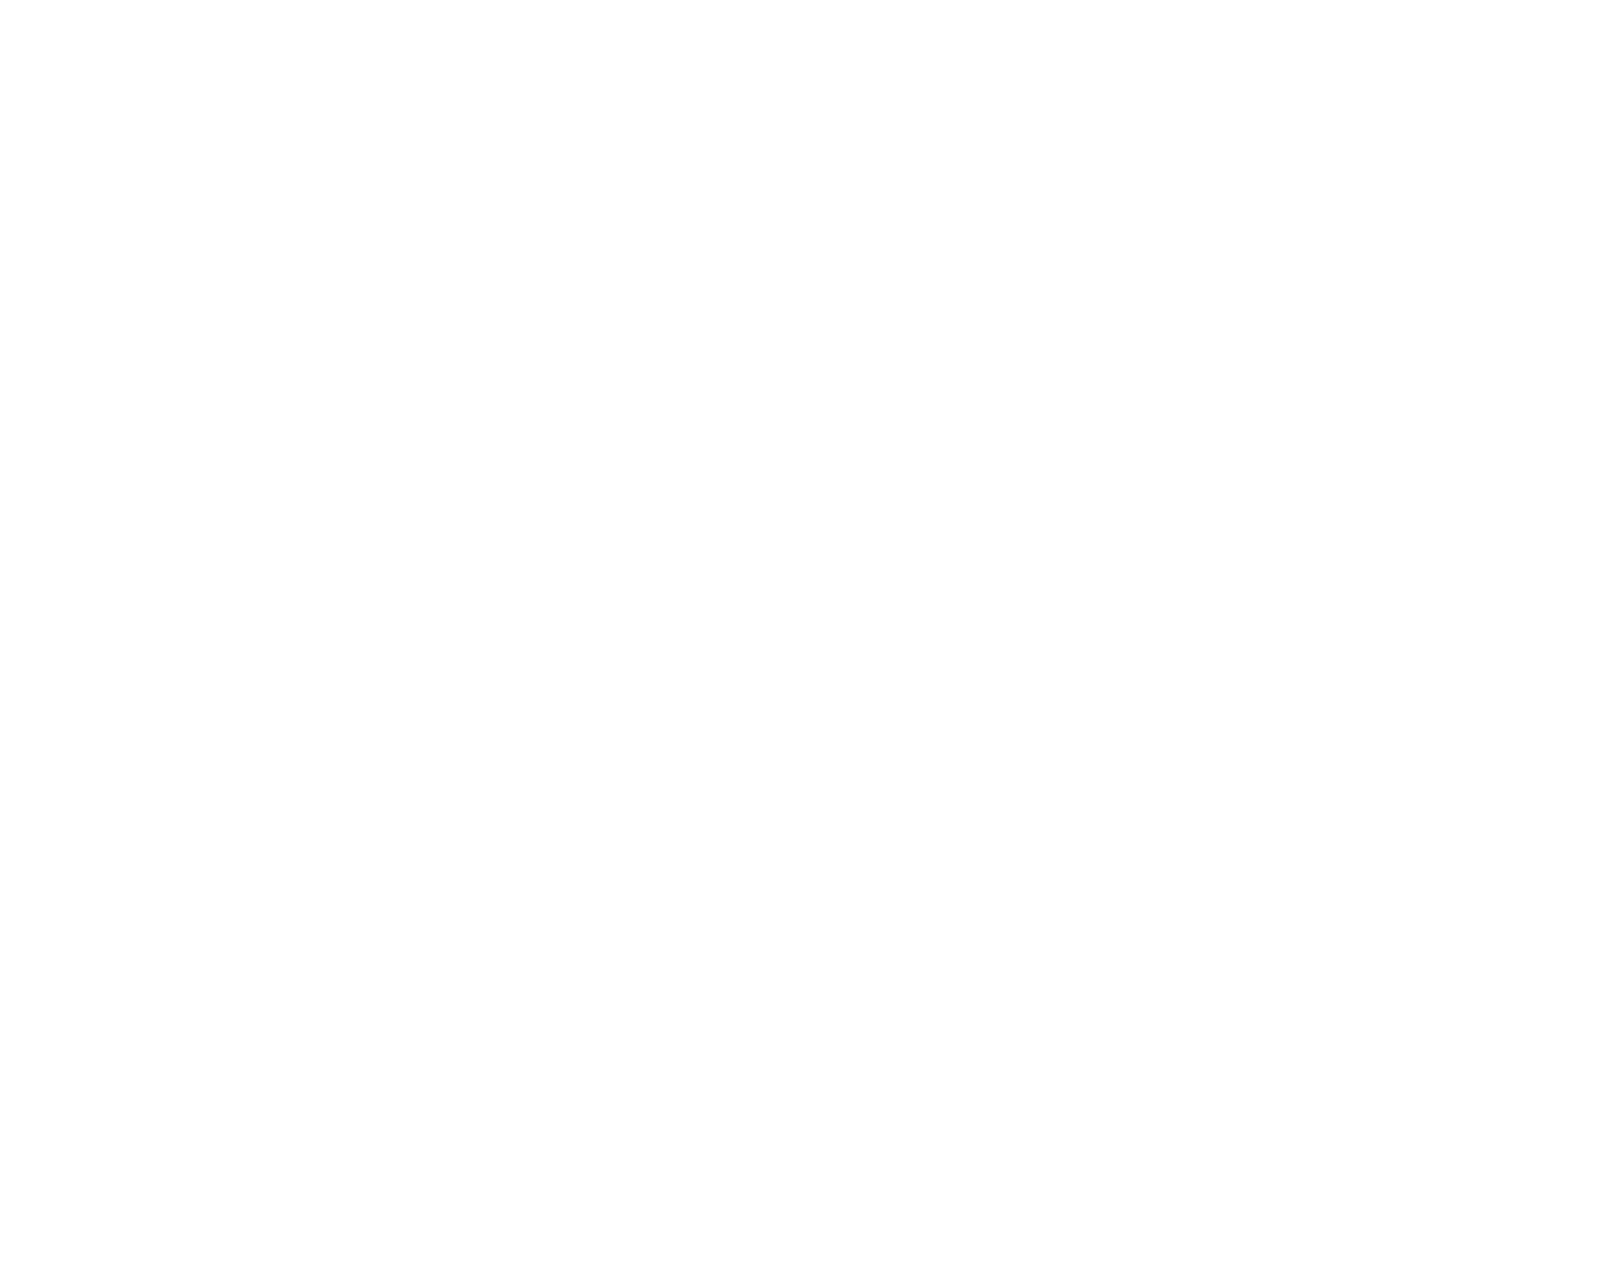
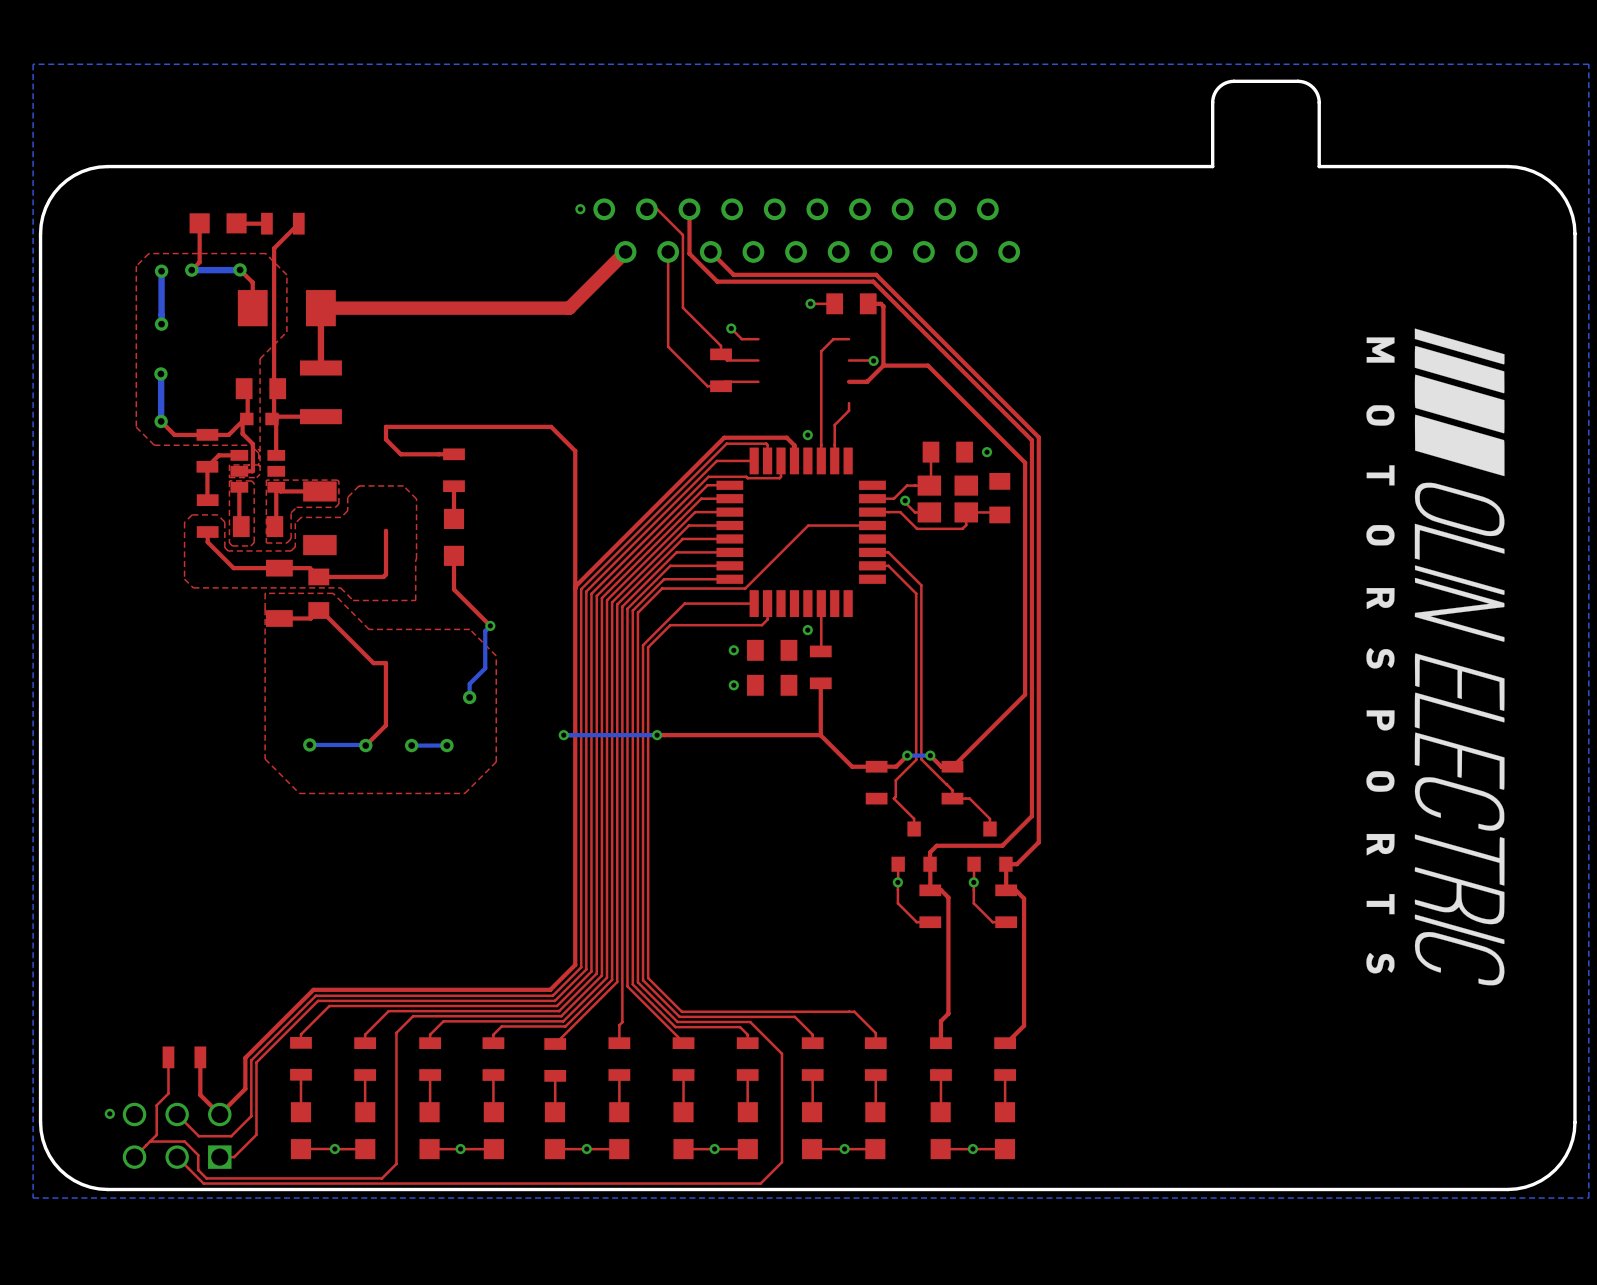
bottom zone outline: none -> (1588, 64) (1588, 1198) (33, 1198) (33, 64) (1588, 64)
board edge: none -> (1297, 81) (1231, 81) (1218, 87) (1212, 99) (1212, 166) (107, 166) (81, 171) (66, 180) (49, 200) (42, 216) (40, 233) (40, 1122) (45, 1148) (54, 1163) (66, 1175) (81, 1184) (107, 1189) (1507, 1189) (1525, 1187) (1548, 1175) (1561, 1163) (1569, 1148) (1574, 1122) (1574, 233) (1572, 216) (1565, 200) (1555, 186) (1541, 175) (1516, 167) (1319, 166) (1318, 97) (1310, 85) (1297, 81)
via: none -> (580, 209)
top track: none -> (647, 209) (657, 209) (682, 235) (682, 307) (721, 345) (721, 354) (727, 360) (758, 360)
top track: none -> (689, 209) (689, 253) (717, 281) (873, 281) (1031, 440) (1031, 816) (1002, 845) (936, 845) (930, 852) (930, 890) (941, 890) (948, 897) (948, 1013) (940, 1021) (940, 1043)
top track: none -> (199, 223) (199, 262) (190, 271)
part: none -> (218, 223)
top track: none -> (265, 223) (236, 223)
part: none -> (282, 223)
top track: none -> (298, 223) (274, 248) (274, 416) (276, 418)
part: none -> (806, 230)
top track: none -> (625, 251) (569, 308) (320, 308)
top track: none -> (668, 251) (668, 346) (707, 386) (721, 386) (725, 381) (758, 381)
top track: none -> (710, 251) (733, 274) (876, 274) (1038, 437) (1038, 842) (1016, 864) (1005, 864)
top zone outline: none -> (265, 253) (286, 274) (286, 331) (260, 358) (260, 474) (256, 477) (229, 477) (229, 464) (258, 464) (258, 453) (250, 445) (154, 445) (136, 427) (136, 266) (148, 253) (265, 253)
top track: none -> (240, 269) (252, 282) (252, 308) (252, 304)
via: none -> (240, 269)
via: none -> (191, 270)
bottom track: none -> (239, 270) (191, 270)
bottom track: none -> (161, 271) (161, 324)
via: none -> (161, 271)
via: none -> (810, 303)
top track: none -> (834, 303) (810, 303)
part: none -> (851, 303)
top track: none -> (868, 303) (880, 303) (883, 306) (883, 365)
part: none -> (286, 308)
top track: none -> (320, 308) (320, 368)
via: none -> (161, 324)
top track: none -> (731, 328) (741, 339) (758, 339)
via: none -> (731, 328)
drawing: none -> [1366, 328, 1505, 986]
top track: none -> (849, 339) (833, 339) (821, 351) (821, 460)
top track: none -> (849, 360) (873, 360)
via: none -> (873, 360)
top track: none -> (883, 365) (867, 381) (849, 381)
top track: none -> (883, 365) (927, 365) (1025, 462) (1025, 694) (953, 766)
part: none -> (721, 370)
via: none -> (160, 373)
bottom track: none -> (161, 374) (161, 421)
top track: none -> (247, 388) (247, 413) (242, 418) (242, 433) (252, 444) (252, 470) (239, 471)
part: none -> (260, 388)
part: none -> (320, 392)
top track: none -> (849, 403) (849, 410) (834, 425) (834, 460)
top track: none -> (320, 416) (278, 416) (276, 418)
part: none -> (259, 418)
top track: none -> (276, 418) (276, 455)
via: none -> (161, 421)
top track: none -> (242, 421) (228, 434) (174, 434) (161, 421)
via: none -> (807, 435)
top zone outline: none -> (257, 449) (260, 451)
part: none -> (207, 450)
top track: none -> (931, 452) (931, 483) (929, 485) (907, 485) (893, 498) (872, 498)
part: none -> (947, 452)
via: none -> (987, 452)
top track: none -> (454, 454) (400, 454) (386, 439) (386, 426) (551, 426) (575, 451) (575, 964) (550, 989) (313, 989) (245, 1057) (245, 1088) (219, 1114) (200, 1095) (200, 1057)
top track: none -> (239, 455) (218, 455) (207, 466) (207, 500)
top track: none -> (754, 460) (716, 460) (586, 591) (586, 969) (554, 1000) (318, 1000) (256, 1062) (256, 1134) (234, 1157) (219, 1157)
top track: none -> (767, 460) (766, 443) (726, 443) (581, 589) (581, 967) (552, 995) (315, 995) (251, 1060) (251, 1116) (231, 1136) (198, 1136) (177, 1114)
top track: none -> (781, 460) (779, 478) (708, 476) (591, 593) (591, 971) (557, 1006) (329, 1006) (300, 1034) (300, 1042)
top track: none -> (794, 460) (794, 445) (786, 437) (724, 437) (575, 586)
top zone outline: none -> (258, 464) (260, 466)
part: none -> (454, 470)
part: none -> (257, 471)
top zone outline: none -> (251, 480) (254, 483) (254, 542) (250, 545) (232, 545) (229, 543) (229, 480) (251, 480)
top zone outline: none -> (337, 480) (266, 480) (266, 543) (286, 543) (291, 538) (291, 512) (296, 507) (335, 507) (338, 503) (338, 481) (337, 480)
top zone outline: none -> (403, 485) (416, 498) (415, 600) (353, 600) (340, 587) (193, 587) (184, 579) (184, 522) (192, 514) (217, 514) (224, 522) (224, 547) (228, 550) (291, 550) (295, 546) (295, 523) (301, 517) (341, 517) (347, 510) (347, 497) (359, 485) (403, 485)
top track: none -> (729, 485) (707, 485) (596, 595) (596, 973) (559, 1011) (388, 1011) (365, 1034) (365, 1043)
top track: none -> (454, 486) (454, 518)
top track: none -> (239, 487) (239, 524) (241, 526)
top track: none -> (315, 487) (319, 491) (280, 491) (276, 487) (274, 526)
top track: none -> (729, 498) (701, 498) (601, 598) (601, 975) (561, 1016) (413, 1016) (396, 1032) (396, 1163) (381, 1178) (206, 1178) (198, 1170) (198, 1155) (184, 1141) (150, 1141)
part: none -> (999, 498)
part: none -> (947, 499)
via: none -> (905, 500)
top track: none -> (905, 502) (915, 512) (929, 512)
top track: none -> (729, 512) (695, 512) (607, 600) (607, 977) (563, 1021) (443, 1021) (430, 1034) (430, 1043)
top track: none -> (872, 512) (900, 512) (917, 528) (962, 528) (966, 525) (966, 512) (997, 512) (999, 514)
part: none -> (207, 516)
part: none -> (319, 518)
top track: none -> (729, 525) (688, 525) (612, 602) (612, 979) (565, 1026) (501, 1026) (493, 1034) (493, 1043)
top track: none -> (872, 525) (808, 525) (745, 588) (662, 588) (637, 612) (637, 982) (677, 1022) (750, 1022) (781, 1053) (781, 1162) (760, 1183) (203, 1183) (177, 1157)
part: none -> (258, 526)
top track: none -> (386, 530) (386, 574) (383, 576)
top track: none -> (202, 532) (207, 532) (207, 542) (233, 568) (310, 568) (318, 576) (383, 576)
part: none -> (801, 532)
part: none -> (454, 537)
top track: none -> (729, 538) (682, 538) (617, 604) (617, 981) (555, 1043)
top track: none -> (729, 552) (676, 552) (622, 606) (622, 1022) (619, 1025) (619, 1043)
top track: none -> (872, 552) (888, 552) (921, 585) (921, 759) (946, 784)
top track: none -> (454, 555) (454, 589) (490, 625)
top track: none -> (729, 565) (670, 565) (627, 608) (627, 986) (683, 1043)
top track: none -> (872, 565) (888, 565) (916, 593) (916, 759) (895, 780) (895, 796) (893, 798) (914, 818) (914, 828)
top track: none -> (729, 579) (664, 579) (632, 610) (632, 984) (675, 1027) (740, 1027) (747, 1034) (747, 1043)
part: none -> (279, 593)
part: none -> (318, 593)
top zone outline: none -> (333, 593) (369, 629) (469, 629) (496, 655) (496, 762) (464, 793) (299, 793) (265, 759) (265, 593) (333, 593)
top track: none -> (754, 603) (684, 603) (643, 645) (643, 980) (679, 1016) (794, 1016) (812, 1034) (812, 1043)
top track: none -> (767, 603) (767, 619) (761, 625) (670, 625) (648, 647) (648, 978) (681, 1011) (854, 1011) (875, 1033) (875, 1043)
top track: none -> (821, 603) (820, 651) (827, 651)
top track: none -> (279, 618) (310, 618) (320, 610) (373, 663) (385, 663) (385, 725) (365, 745)
bottom track: none -> (490, 625) (485, 631) (485, 668) (469, 683) (469, 697)
via: none -> (490, 625)
via: none -> (807, 630)
via: none -> (733, 650)
part: none -> (772, 650)
part: none -> (820, 667)
top track: none -> (820, 683) (820, 735)
via: none -> (733, 685)
part: none -> (772, 685)
via: none -> (469, 697)
via: none -> (563, 735)
top track: none -> (657, 735) (820, 735) (852, 766) (896, 766) (907, 755)
bottom track: none -> (657, 735) (563, 735)
via: none -> (657, 735)
bottom track: none -> (309, 744) (365, 745)
via: none -> (309, 744)
via: none -> (365, 745)
via: none -> (411, 745)
bottom track: none -> (446, 745) (411, 745)
via: none -> (446, 745)
via: none -> (907, 755)
top track: none -> (930, 755) (941, 766) (952, 766)
bottom track: none -> (930, 755) (907, 755)
via: none -> (930, 755)
part: none -> (876, 782)
part: none -> (952, 782)
top track: none -> (946, 784) (952, 790) (952, 798) (969, 798) (989, 818) (989, 828)
part: none -> (914, 846)
part: none -> (989, 846)
top track: none -> (898, 864) (897, 903) (916, 922) (930, 922)
top track: none -> (974, 864) (973, 903) (992, 922) (1006, 922)
top track: none -> (1005, 864) (1006, 890) (1015, 890) (1024, 898) (1024, 1025) (1005, 1043)
via: none -> (897, 882)
via: none -> (973, 882)
part: none -> (930, 906)
part: none -> (1006, 906)
top track: none -> (168, 1057) (168, 1093) (156, 1105) (156, 1134) (134, 1157)
part: none -> (184, 1057)
part: none -> (300, 1058)
part: none -> (365, 1059)
part: none -> (430, 1059)
part: none -> (493, 1059)
part: none -> (555, 1059)
part: none -> (619, 1059)
part: none -> (683, 1059)
part: none -> (747, 1059)
part: none -> (812, 1059)
part: none -> (875, 1059)
part: none -> (940, 1059)
part: none -> (1005, 1059)
top track: none -> (300, 1074) (300, 1112)
top track: none -> (365, 1075) (365, 1112)
top track: none -> (430, 1075) (429, 1112)
top track: none -> (493, 1075) (493, 1112)
top track: none -> (555, 1075) (554, 1112)
top track: none -> (619, 1075) (619, 1112)
top track: none -> (683, 1075) (683, 1112)
top track: none -> (747, 1075) (747, 1112)
top track: none -> (812, 1075) (812, 1112)
top track: none -> (875, 1075) (875, 1112)
top track: none -> (940, 1075) (940, 1112)
top track: none -> (1005, 1075) (1005, 1112)
via: none -> (109, 1113)
part: none -> (300, 1130)
part: none -> (365, 1130)
part: none -> (429, 1130)
part: none -> (493, 1130)
part: none -> (554, 1130)
part: none -> (619, 1130)
part: none -> (683, 1130)
part: none -> (747, 1130)
part: none -> (812, 1130)
part: none -> (875, 1130)
part: none -> (940, 1130)
part: none -> (1004, 1130)
part: none -> (177, 1135)
top track: none -> (334, 1149) (301, 1149)
via: none -> (334, 1149)
top track: none -> (365, 1149) (335, 1149)
top track: none -> (460, 1149) (429, 1149)
via: none -> (460, 1149)
top track: none -> (493, 1149) (460, 1149)
top track: none -> (586, 1149) (554, 1149)
via: none -> (586, 1149)
top track: none -> (619, 1149) (586, 1149)
top track: none -> (714, 1149) (683, 1149)
via: none -> (714, 1149)
top track: none -> (747, 1149) (714, 1149)
top track: none -> (844, 1149) (812, 1149)
via: none -> (844, 1149)
top track: none -> (875, 1149) (844, 1149)
top track: none -> (972, 1149) (940, 1149)
via: none -> (972, 1149)
top track: none -> (1004, 1149) (973, 1149)

